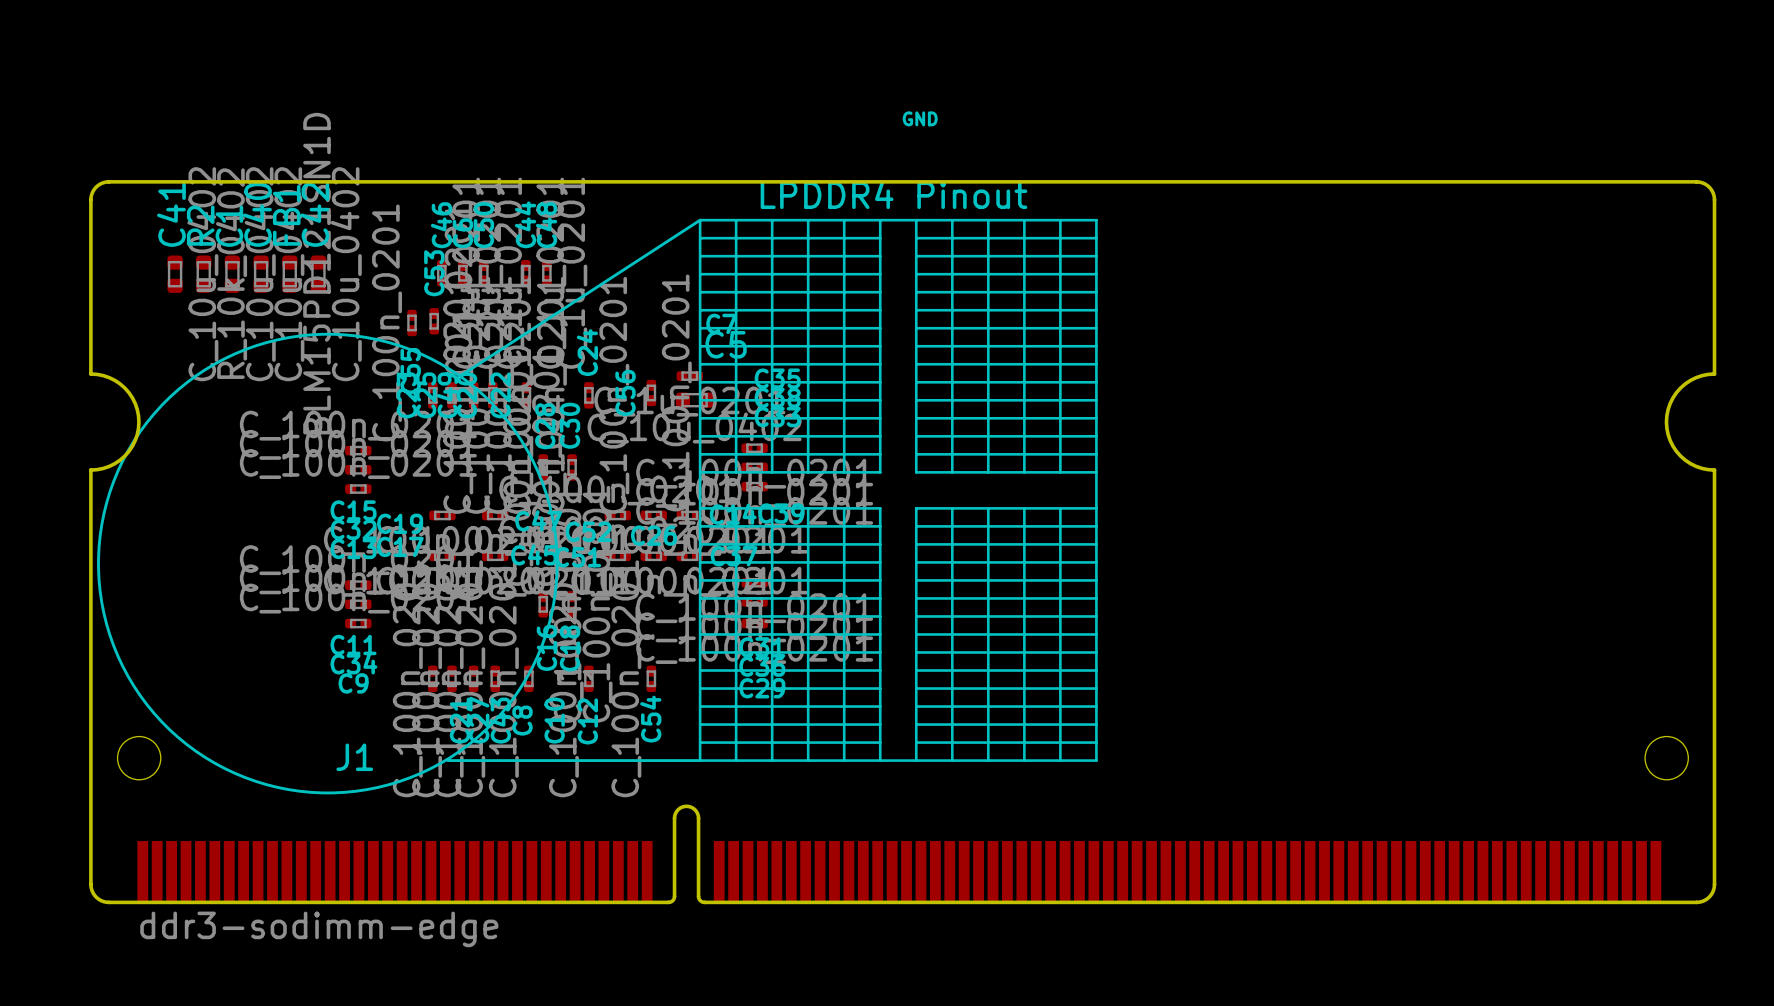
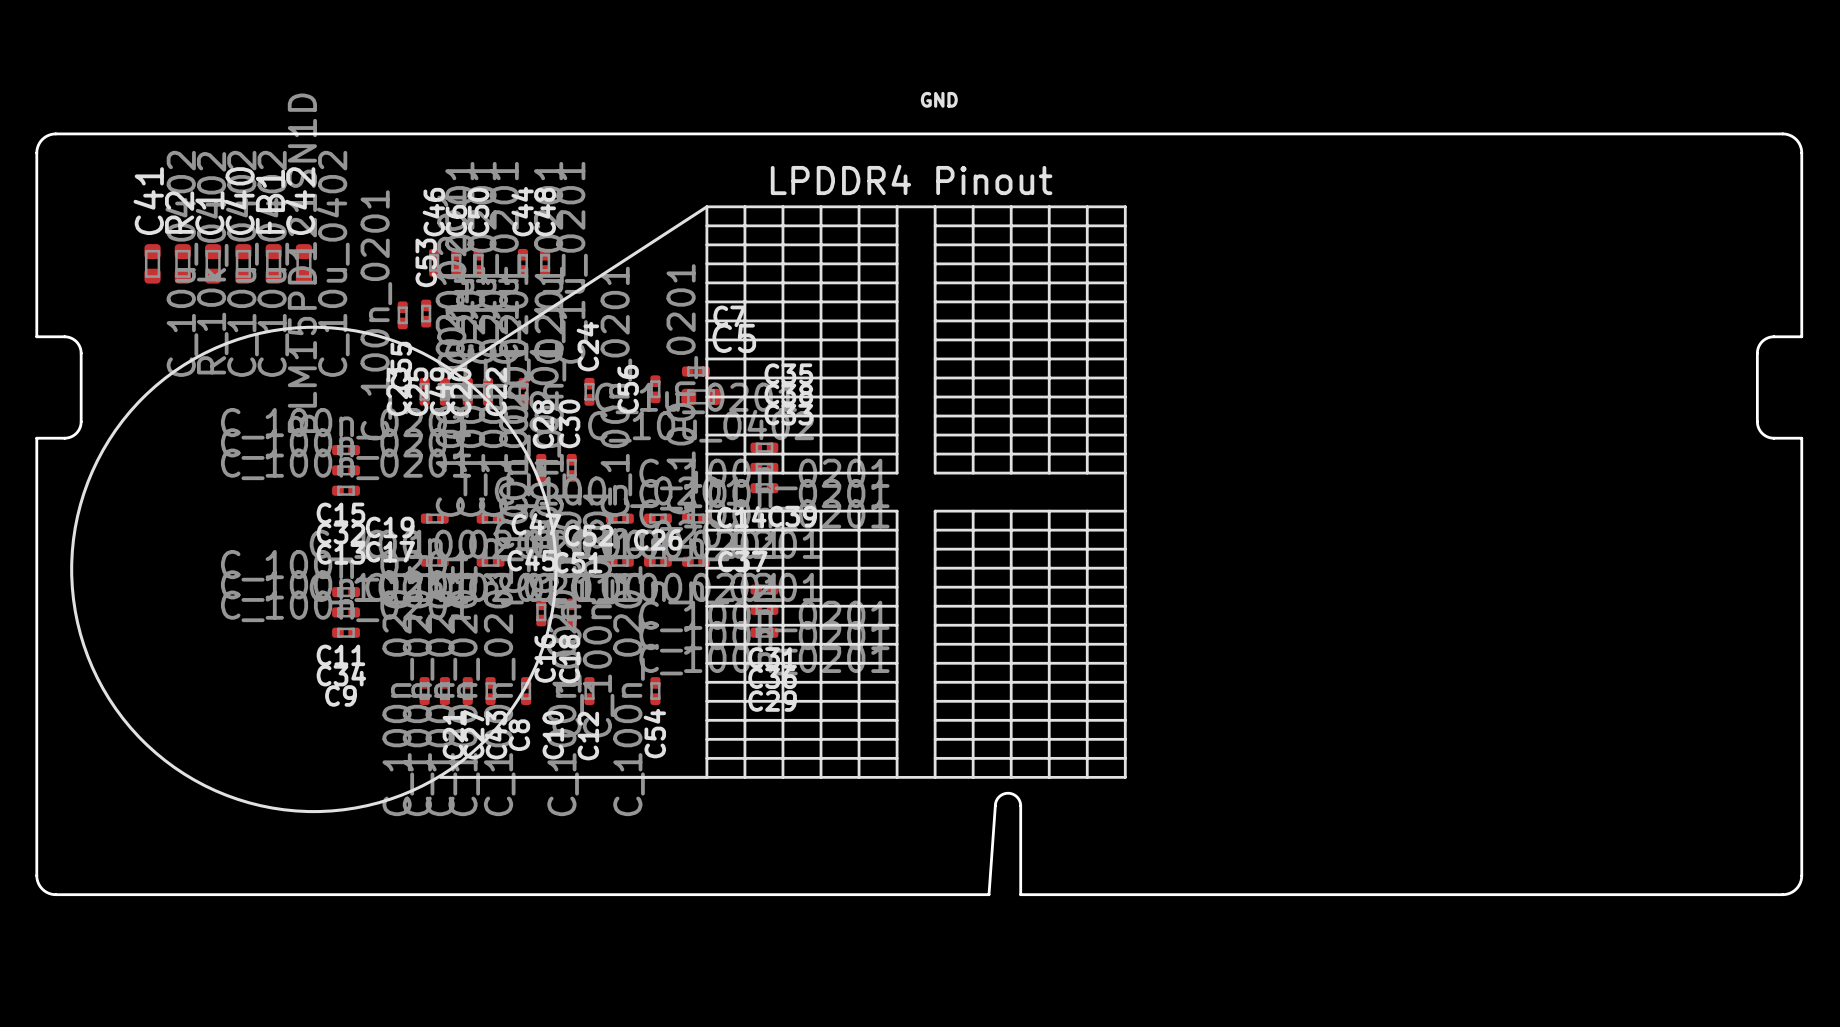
board edge: (108, 181) (1703, 183) (1710, 188) (1714, 199) (1714, 374) (1696, 377) (1680, 388) (1670, 403) (1666, 422) (1670, 440) (1680, 456) (1696, 466) (1714, 470) (1713, 891) (1707, 898) (1696, 902) (703, 902) (698, 896) (698, 816) (693, 808) (686, 806) (679, 808) (674, 816) (674, 896) (669, 902) (102, 901) (94, 895) (90, 884) (90, 470) (109, 466) (124, 456) (135, 440) (138, 422) (135, 403) (124, 388) (109, 377) (90, 374) (91, 197) (96, 187) (108, 181) -> (55, 133) (42, 139) (36, 150) (36, 336) (66, 336) (72, 338) (78, 345) (81, 353) (81, 421) (78, 429) (70, 436) (36, 438) (36, 875) (40, 887) (48, 893) (989, 894) (995, 804) (1000, 795) (1008, 793) (1015, 795) (1020, 804) (1020, 894) (1782, 894) (1794, 890) (1800, 882) (1801, 438) (1767, 436) (1760, 431) (1757, 421) (1757, 353) (1759, 345) (1765, 338) (1771, 336) (1801, 336) (1801, 152) (1797, 141) (1790, 135) (55, 133)
J1: ddr3-sodimm-edge (902, 818) -> none

